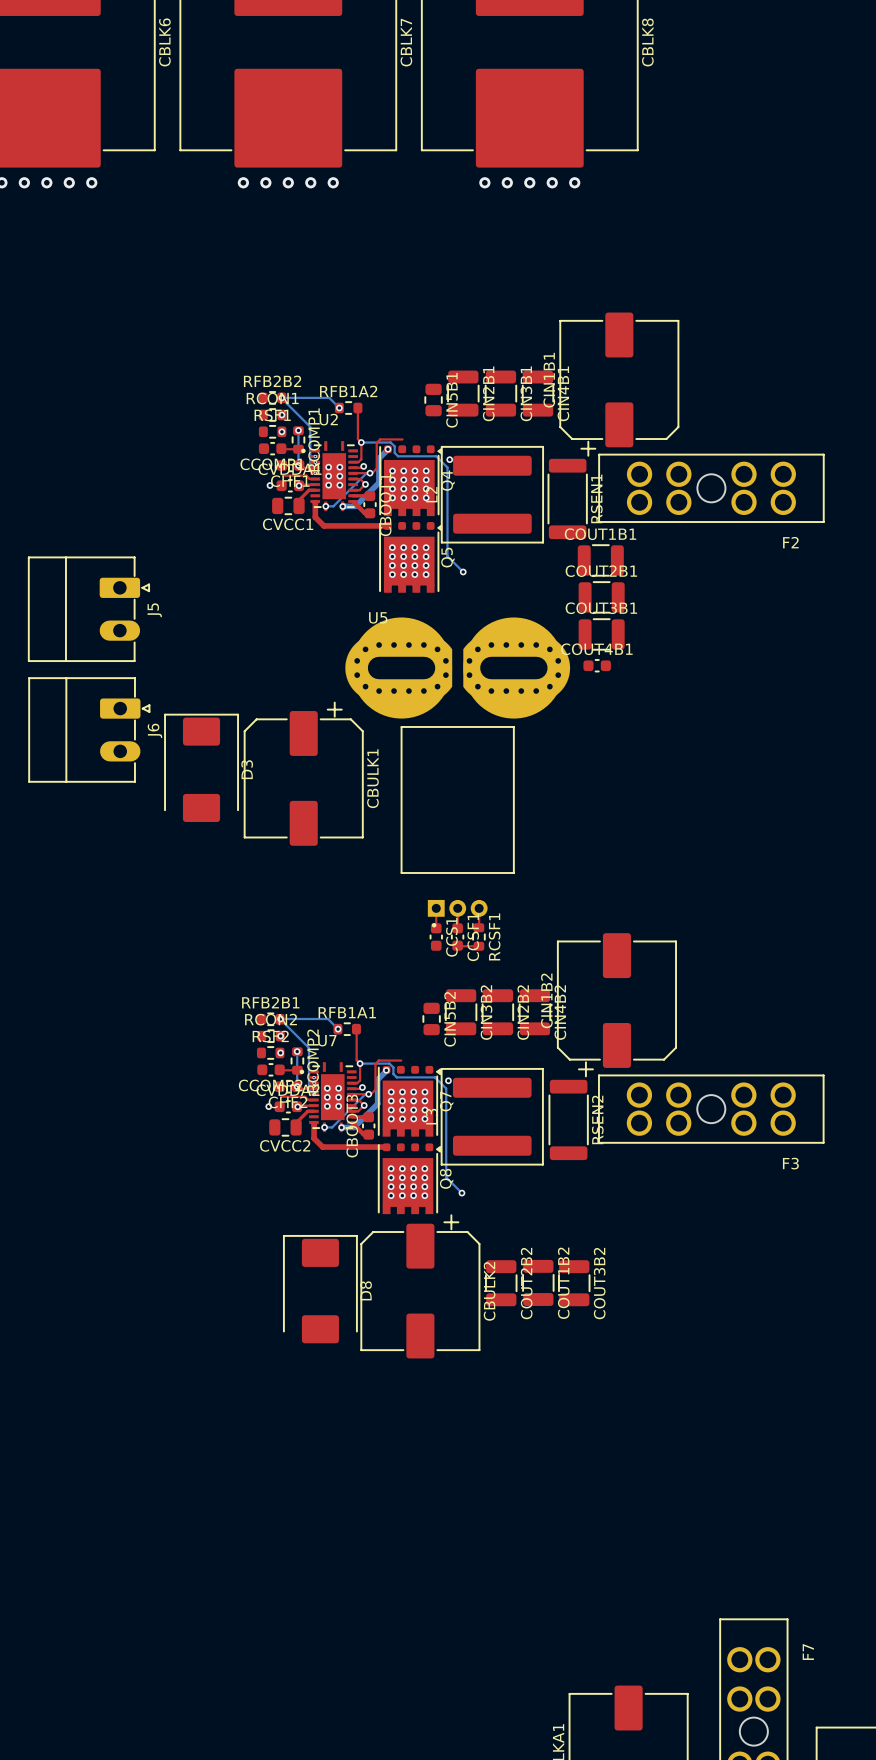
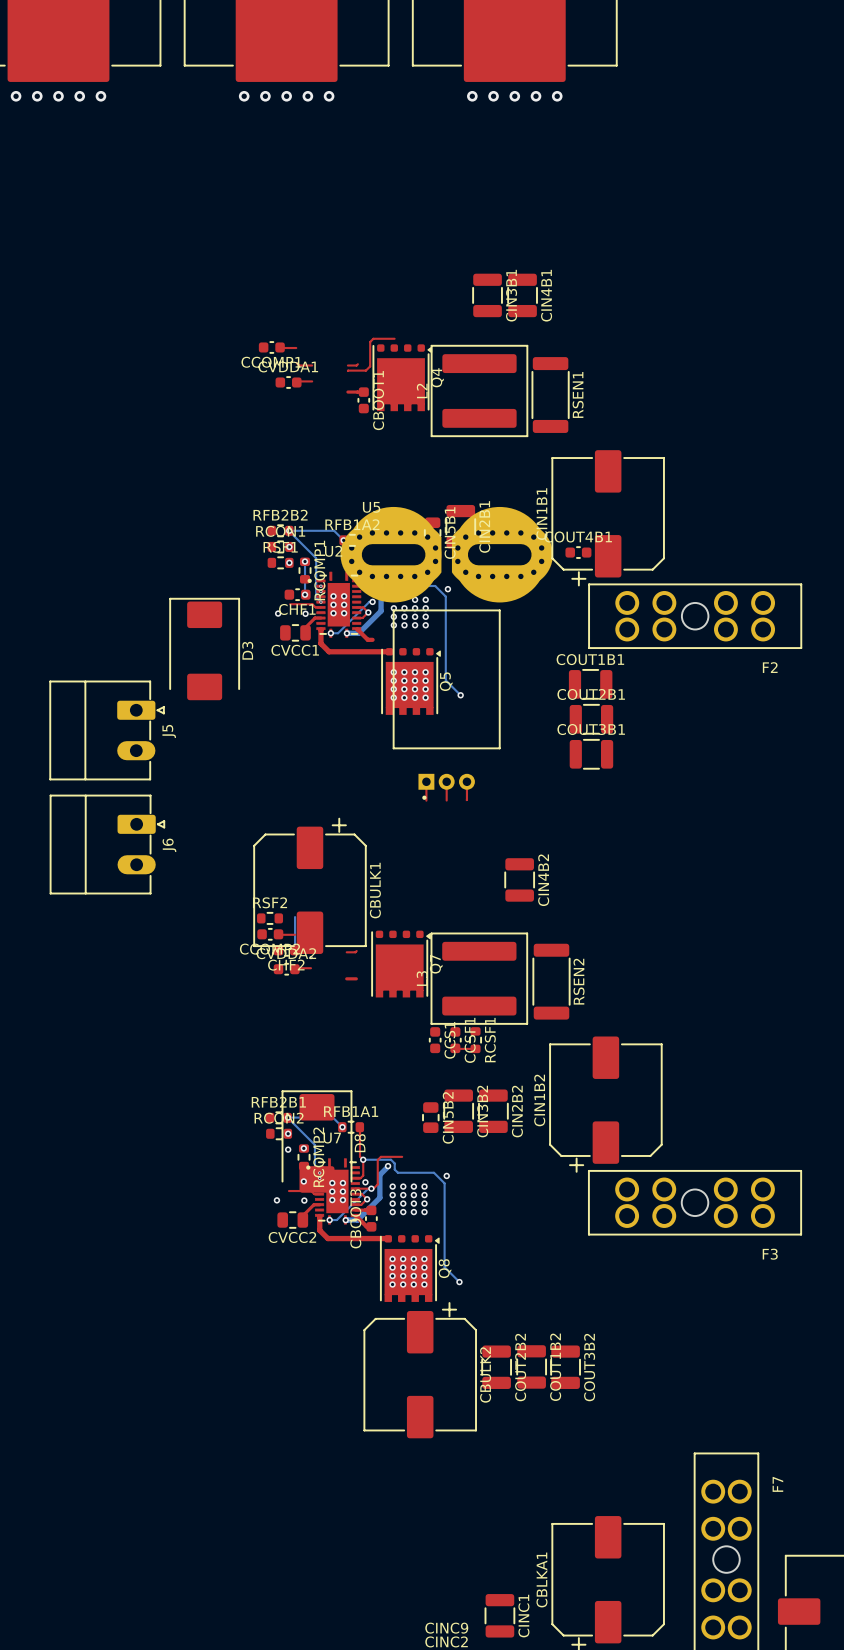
CIN1B1 position: (619, 384) -> (608, 518)
CIN2B1 position: (463, 393) -> (460, 526)
RFB2B2 position: (272, 397) -> (280, 530)
via: (281, 397) -> none
CIN5B1 position: (433, 400) -> (432, 532)
bottom track: (339, 408) (329, 397) (281, 397) (310, 426) (310, 468) (315, 473) -> (343, 540) (334, 530) (289, 530) (316, 558) (316, 597) (320, 602)
via: (339, 408) -> none
RFB1A2 position: (348, 408) -> (352, 540)
top track: (357, 408) (357, 439) (361, 443) -> none
RCON1 position: (272, 414) -> (280, 546)
via: (281, 414) -> none
bottom track: (298, 430) (298, 465) -> (305, 561) (305, 594)
via: (298, 430) -> none
RSF1 position: (272, 431) -> (280, 562)
via: (281, 431) -> none
RCOMP1 position: (298, 439) -> (305, 570)
bottom track: (361, 442) (390, 442) (394, 446) (394, 452) (398, 456) (436, 456) (447, 467) (447, 556) (463, 571) -> (364, 572) (392, 572) (395, 576) (395, 582) (399, 585) (435, 585) (445, 596) (445, 680) (460, 695)
via: (361, 442) -> none
top track: (361, 443) (361, 459) (358, 462) (353, 462) -> none
bottom track: (387, 449) (378, 458) (378, 482) (355, 506) (344, 506) -> (389, 579) (381, 588) (381, 611) (358, 633) (348, 633)
via: (387, 449) -> none
via: (315, 456) -> none
via: (449, 459) -> none
via: (315, 462) -> none
CHF1 position: (290, 465) -> (297, 594)
via: (298, 465) -> none
via: (363, 466) -> none
via: (328, 467) -> none
via: (339, 467) -> none
via: (392, 470) -> none
via: (403, 470) -> none
via: (414, 470) -> none
via: (426, 470) -> none
via: (315, 473) -> none
bottom track: (369, 473) (366, 473) (333, 506) (325, 506) -> (372, 601) (369, 601) (338, 633) (330, 633)
via: (369, 473) -> none
top track: (282, 475) (306, 475) (309, 478) (315, 478) -> (290, 604) (312, 604) (315, 607) (320, 607)
via: (328, 476) -> none
U2 position: (329, 476) -> (334, 604)
via: (339, 476) -> none
top track: (353, 478) (360, 478) (365, 484) (359, 490) (353, 490) -> (356, 607) (363, 607) (368, 612) (362, 618) (356, 618)
via: (392, 479) -> none
via: (403, 479) -> none
via: (414, 479) -> none
via: (426, 479) -> none
via: (365, 484) -> none
via: (270, 485) -> none
via: (299, 485) -> none
via: (328, 485) -> none
via: (339, 485) -> none
via: (392, 488) -> none
via: (403, 488) -> none
via: (414, 488) -> none
via: (426, 488) -> none
F2 position: (711, 488) -> (695, 616)
top track: (315, 490) (309, 490) (299, 500) (299, 505) (299, 499) -> (320, 618) (315, 618) (305, 627) (305, 632) (305, 627)
via: (392, 497) -> none
via: (403, 497) -> none
via: (414, 497) -> none
via: (426, 497) -> none
top track: (315, 502) (315, 517) (323, 525) (387, 525) -> (320, 629) (320, 643) (329, 651) (389, 651)
top track: (353, 502) (364, 513) (369, 513) -> (357, 629) (367, 639) (372, 639)
CVCC1 position: (288, 505) -> (295, 632)
via: (325, 506) -> none
via: (342, 506) -> none
via: (392, 547) -> none
via: (403, 547) -> none
via: (414, 547) -> none
via: (426, 547) -> none
via: (392, 556) -> none
via: (403, 556) -> none
via: (414, 556) -> none
via: (426, 556) -> none
Q5 position: (410, 557) -> (411, 681)
COUT1B1 position: (600, 560) -> (590, 684)
via: (392, 565) -> none
via: (403, 565) -> none
via: (414, 565) -> none
via: (426, 565) -> none
via: (463, 571) -> none
via: (392, 574) -> none
via: (403, 574) -> none
via: (414, 574) -> none
via: (426, 574) -> none
COUT2B1 position: (601, 597) -> (591, 719)
J5 position: (88, 609) -> (107, 730)
COUT3B1 position: (601, 634) -> (591, 754)
via: none -> (289, 530)
via: none -> (343, 540)
via: none -> (289, 546)
via: none -> (305, 561)
via: none -> (289, 562)
via: none -> (320, 586)
via: none -> (447, 589)
via: none -> (320, 591)
via: none -> (305, 594)
via: none -> (333, 596)
via: none -> (344, 596)
via: none -> (415, 599)
via: none -> (425, 599)
via: none -> (372, 601)
via: none -> (320, 602)
via: none -> (333, 604)
via: none -> (344, 604)
via: none -> (393, 608)
via: none -> (404, 608)
via: none -> (415, 608)
via: none -> (425, 608)
J6 position: (89, 729) -> (107, 844)
via: none -> (333, 613)
via: none -> (344, 613)
via: none -> (368, 612)
via: none -> (278, 613)
via: none -> (305, 613)
via: none -> (393, 616)
via: none -> (404, 616)
via: none -> (415, 616)
via: none -> (425, 616)
via: none -> (393, 625)
via: none -> (404, 625)
via: none -> (415, 625)
via: none -> (425, 625)
via: none -> (330, 633)
via: none -> (346, 633)
CBULK1 position: (303, 773) -> (309, 886)
via: none -> (393, 672)
via: none -> (404, 672)
via: none -> (414, 672)
via: none -> (425, 672)
via: none -> (393, 680)
via: none -> (404, 680)
via: none -> (414, 680)
via: none -> (425, 680)
via: none -> (393, 689)
via: none -> (404, 689)
via: none -> (414, 689)
via: none -> (425, 689)
via: none -> (460, 695)
via: none -> (393, 697)
via: none -> (404, 697)
via: none -> (414, 697)
via: none -> (425, 697)
CCS1 position: (436, 937) -> (435, 1040)
CCSF1 position: (457, 937) -> (455, 1040)
RCSF1 position: (478, 937) -> (475, 1040)
top track: (457, 945) (478, 946) -> (455, 1048) (475, 1048)
CIN1B2 position: (616, 1005) -> (605, 1104)
CIN3B2 position: (461, 1012) -> (458, 1111)
CIN2B2 position: (497, 1012) -> (493, 1111)
via: (280, 1018) -> none
CIN5B2 position: (431, 1018) -> (430, 1117)
RFB2B1 position: (270, 1019) -> (278, 1117)
bottom track: (338, 1029) (328, 1018) (280, 1018) (309, 1048) (309, 1089) (314, 1094) -> (342, 1127) (332, 1117) (288, 1117) (314, 1144) (314, 1184) (319, 1188)
via: (338, 1029) -> none
RFB1A1 position: (347, 1029) -> (351, 1127)
top track: (356, 1029) (356, 1060) (360, 1063) (360, 1080) (357, 1083) (351, 1083) -> none
RCON2 position: (271, 1036) -> (279, 1133)
via: (280, 1036) -> none
via: (297, 1051) -> none
via: (280, 1052) -> none
top track: (401, 1060) (378, 1060) (375, 1063) (375, 1089) (370, 1094) (351, 1094) -> (402, 1156) (380, 1156) (377, 1160) (377, 1184) (373, 1188) (355, 1188)
RCOMP2 position: (297, 1061) -> (304, 1157)
bottom track: (360, 1063) (389, 1063) (393, 1067) (393, 1074) (396, 1077) (434, 1077) (446, 1088) (446, 1177) (461, 1193) -> (363, 1159) (391, 1159) (394, 1163) (394, 1169) (397, 1172) (433, 1172) (444, 1183) (444, 1267) (459, 1282)
via: (360, 1063) -> none
bottom track: (386, 1070) (377, 1079) (377, 1103) (354, 1127) (343, 1127) -> (388, 1166) (379, 1174) (379, 1197) (357, 1220) (347, 1220)
via: (386, 1070) -> none
via: (314, 1077) -> none
via: (448, 1080) -> none
via: (314, 1083) -> none
via: (297, 1086) -> none
via: (362, 1087) -> none
via: (327, 1088) -> none
via: (338, 1088) -> none
via: (391, 1092) -> none
via: (402, 1092) -> none
via: (413, 1092) -> none
via: (424, 1092) -> none
bottom track: (368, 1094) (365, 1094) (332, 1127) (324, 1127) -> (371, 1188) (368, 1188) (336, 1220) (329, 1220)
via: (368, 1094) -> none
top track: (281, 1096) (305, 1096) (308, 1100) (314, 1100) -> (288, 1191) (311, 1191) (314, 1194) (319, 1194)
via: (327, 1097) -> none
U7 position: (328, 1097) -> (333, 1191)
via: (338, 1097) -> none
top track: (351, 1100) (358, 1100) (364, 1105) (358, 1111) (351, 1111) -> (355, 1194) (362, 1194) (367, 1199) (361, 1204) (355, 1204)
via: (391, 1101) -> none
via: (402, 1101) -> none
via: (413, 1101) -> none
via: (424, 1101) -> none
via: (364, 1105) -> none
via: (268, 1106) -> none
via: (297, 1106) -> none
via: (327, 1106) -> none
via: (338, 1106) -> none
F3 position: (711, 1109) -> (695, 1202)
via: (391, 1110) -> none
via: (402, 1110) -> none
via: (413, 1110) -> none
via: (424, 1110) -> none
top track: (314, 1111) (307, 1111) (297, 1121) (297, 1127) (297, 1120) -> (319, 1204) (313, 1204) (304, 1214) (304, 1219) (304, 1213)
via: (391, 1118) -> none
via: (402, 1118) -> none
via: (413, 1118) -> none
via: (424, 1118) -> none
top track: (314, 1123) (314, 1138) (322, 1147) (386, 1147) -> (319, 1216) (319, 1230) (327, 1238) (388, 1238)
top track: (352, 1123) (363, 1134) (368, 1134) -> (356, 1216) (366, 1226) (371, 1226)
CBOOT3 position: (368, 1125) -> (371, 1218)
CVCC2 position: (285, 1127) -> (292, 1220)
via: (324, 1127) -> none
via: (341, 1127) -> none
via: (391, 1168) -> none
via: (402, 1168) -> none
via: (413, 1168) -> none
via: (424, 1168) -> none
via: (391, 1177) -> none
via: (402, 1177) -> none
via: (413, 1177) -> none
via: (424, 1177) -> none
Q8 position: (409, 1178) -> (409, 1268)
via: (391, 1186) -> none
via: (402, 1186) -> none
via: (413, 1186) -> none
via: (424, 1186) -> none
via: (461, 1193) -> none
via: (391, 1195) -> none
via: (402, 1195) -> none
via: (413, 1195) -> none
via: (424, 1195) -> none
via: none -> (288, 1117)
via: none -> (342, 1127)
top track: none -> (359, 1127) (359, 1156) (363, 1160)
via: none -> (288, 1133)
COUT1B2 position: (538, 1282) -> (531, 1366)
COUT2B2 position: (501, 1283) -> (496, 1367)
COUT3B2 position: (574, 1283) -> (565, 1367)
CBULK2 position: (420, 1286) -> (420, 1370)
via: none -> (303, 1148)
via: none -> (288, 1149)
via: none -> (363, 1159)
top track: none -> (363, 1160) (363, 1175) (360, 1178) (355, 1178)
via: none -> (388, 1166)
via: none -> (319, 1172)
via: none -> (446, 1175)
via: none -> (319, 1178)
via: none -> (303, 1181)
via: none -> (365, 1182)
via: none -> (332, 1183)
via: none -> (342, 1183)
via: none -> (392, 1186)
via: none -> (403, 1186)
via: none -> (413, 1186)
via: none -> (424, 1186)
via: none -> (371, 1188)
via: none -> (332, 1191)
via: none -> (342, 1191)
via: none -> (392, 1195)
via: none -> (403, 1195)
via: none -> (413, 1195)
via: none -> (424, 1195)
via: none -> (367, 1199)
via: none -> (276, 1200)
via: none -> (304, 1200)
via: none -> (332, 1200)
via: none -> (342, 1200)
via: none -> (392, 1203)
via: none -> (403, 1203)
via: none -> (413, 1203)
via: none -> (424, 1203)
via: none -> (392, 1212)
via: none -> (403, 1212)
via: none -> (413, 1212)
via: none -> (424, 1212)
via: none -> (329, 1220)
via: none -> (345, 1220)
via: none -> (392, 1259)
via: none -> (403, 1259)
via: none -> (413, 1259)
via: none -> (424, 1259)
via: none -> (392, 1267)
via: none -> (403, 1267)
via: none -> (413, 1267)
via: none -> (424, 1267)
via: none -> (392, 1276)
via: none -> (403, 1276)
via: none -> (413, 1276)
via: none -> (424, 1276)
via: none -> (459, 1282)
via: none -> (392, 1284)
via: none -> (403, 1284)
via: none -> (413, 1284)
via: none -> (424, 1284)

